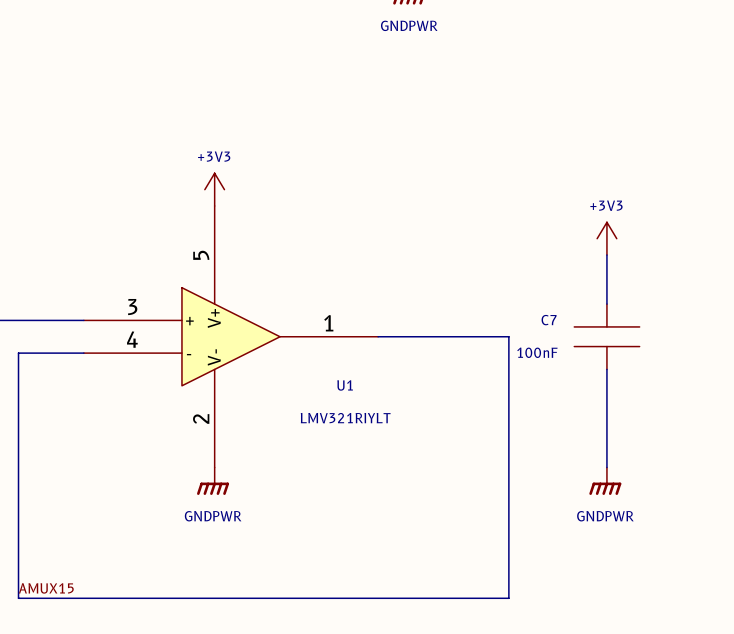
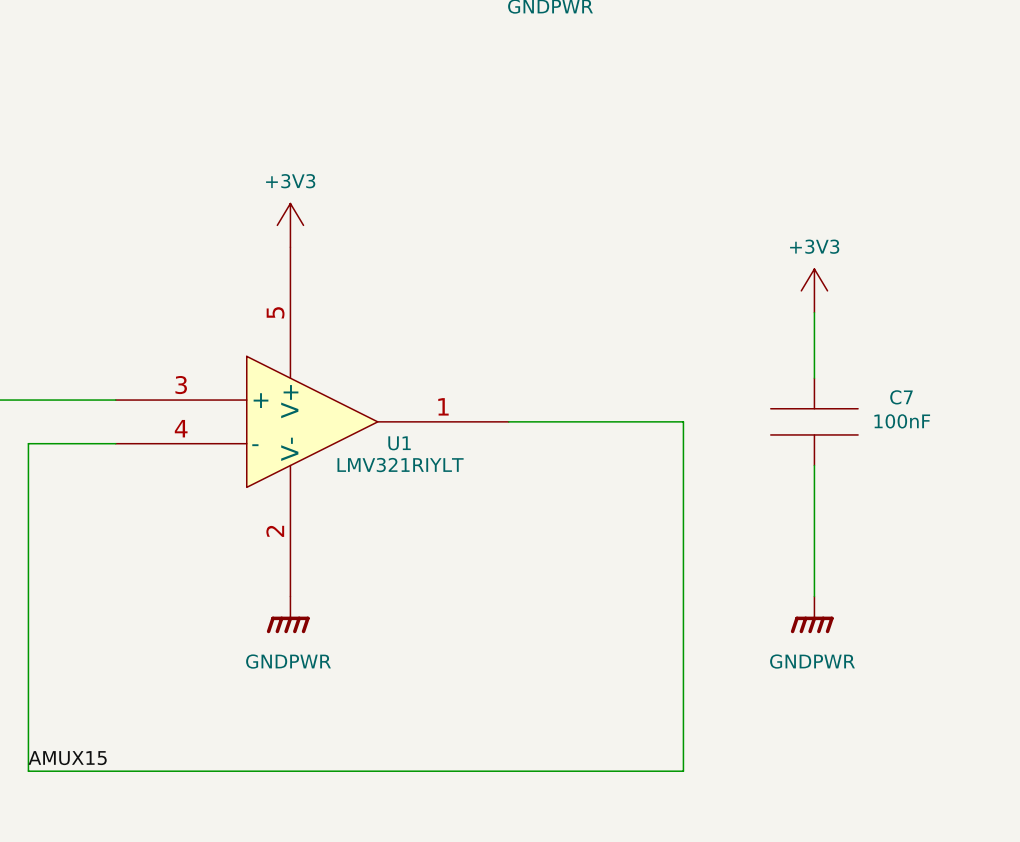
U1 symbol: [83, 205, 379, 468] -> [115, 247, 509, 597]
C7 name position: C7 (549, 320) -> C7 (901, 397)
C7 value position: 100nF (537, 352) -> 100nF (902, 421)
U1 name position: U1 (345, 385) -> U1 (399, 443)
U1 value position: LMV321RIYLT (345, 418) -> LMV321RIYLT (400, 465)

